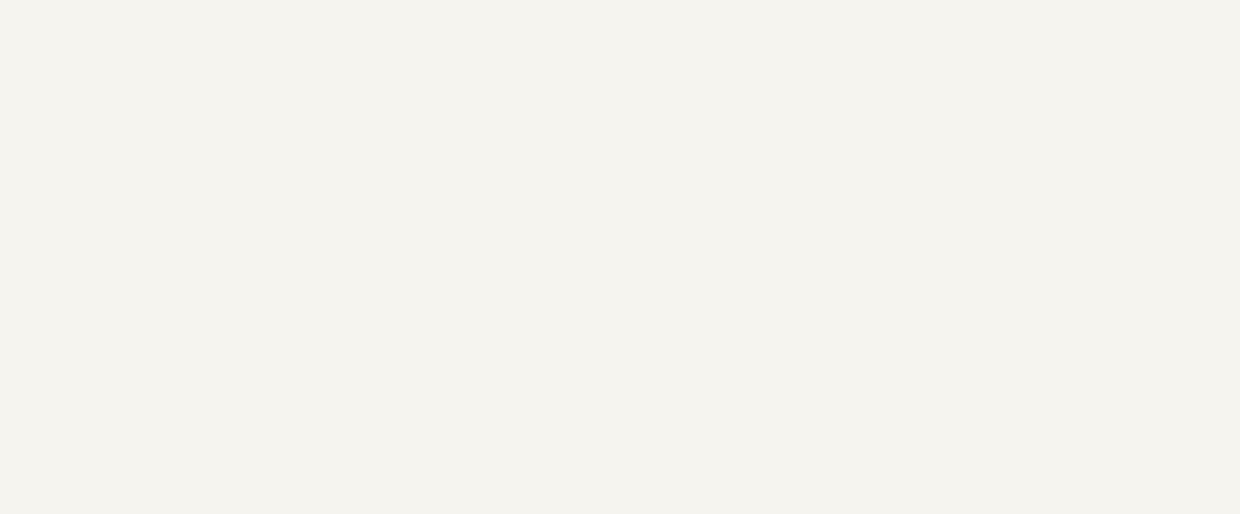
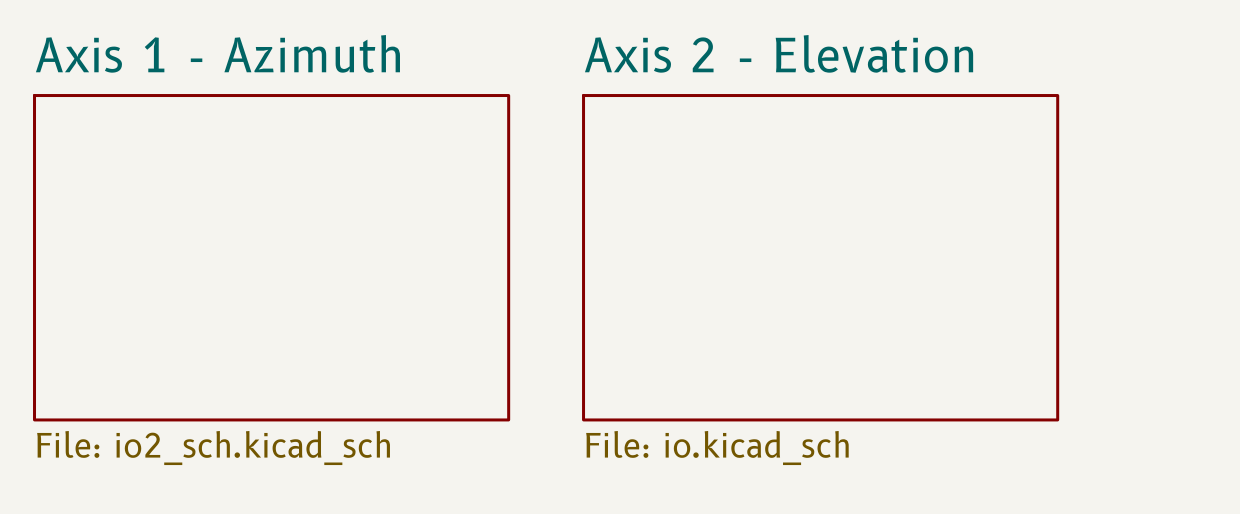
sheet Axis 1 - Azimuth: none -> File: io2_sch.kicad_sch (271, 257)
sheet Axis 2 - Elevation: none -> File: io.kicad_sch (820, 257)

